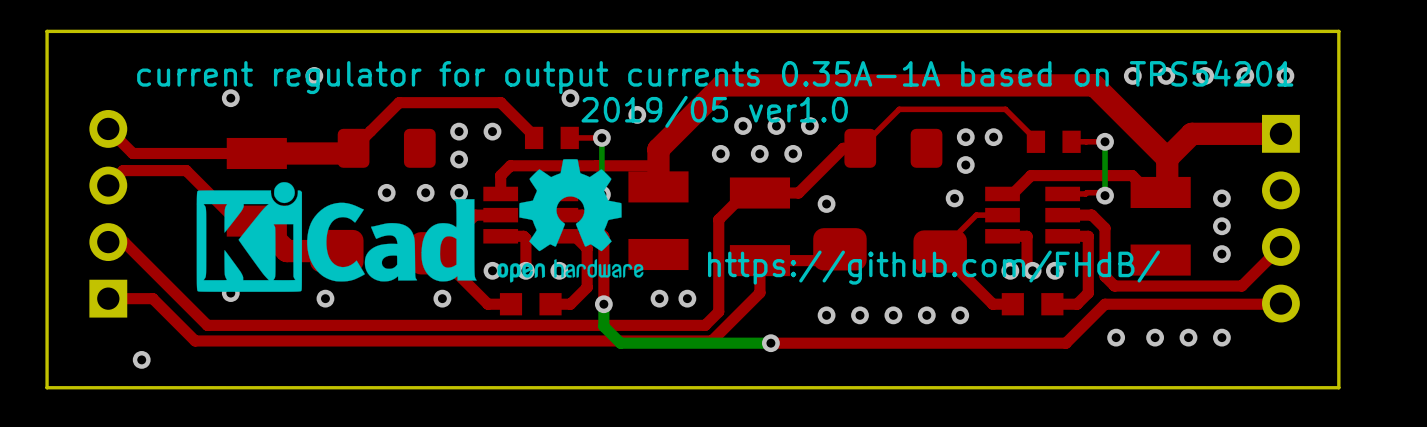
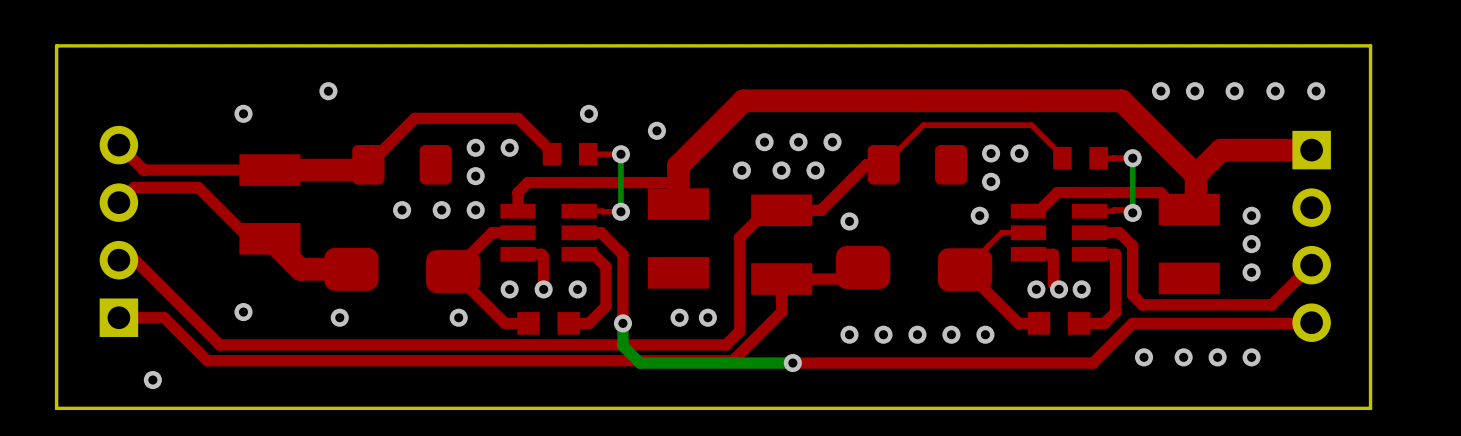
text: current regulator for output currents 0.35A-1A based on TPS54201 (715, 77) -> none
text: 2019/05 ver1.0 (714, 111) -> none
drawing: [196, 159, 644, 292] -> none
text: https://github.com/FHdB/ (933, 267) -> none

